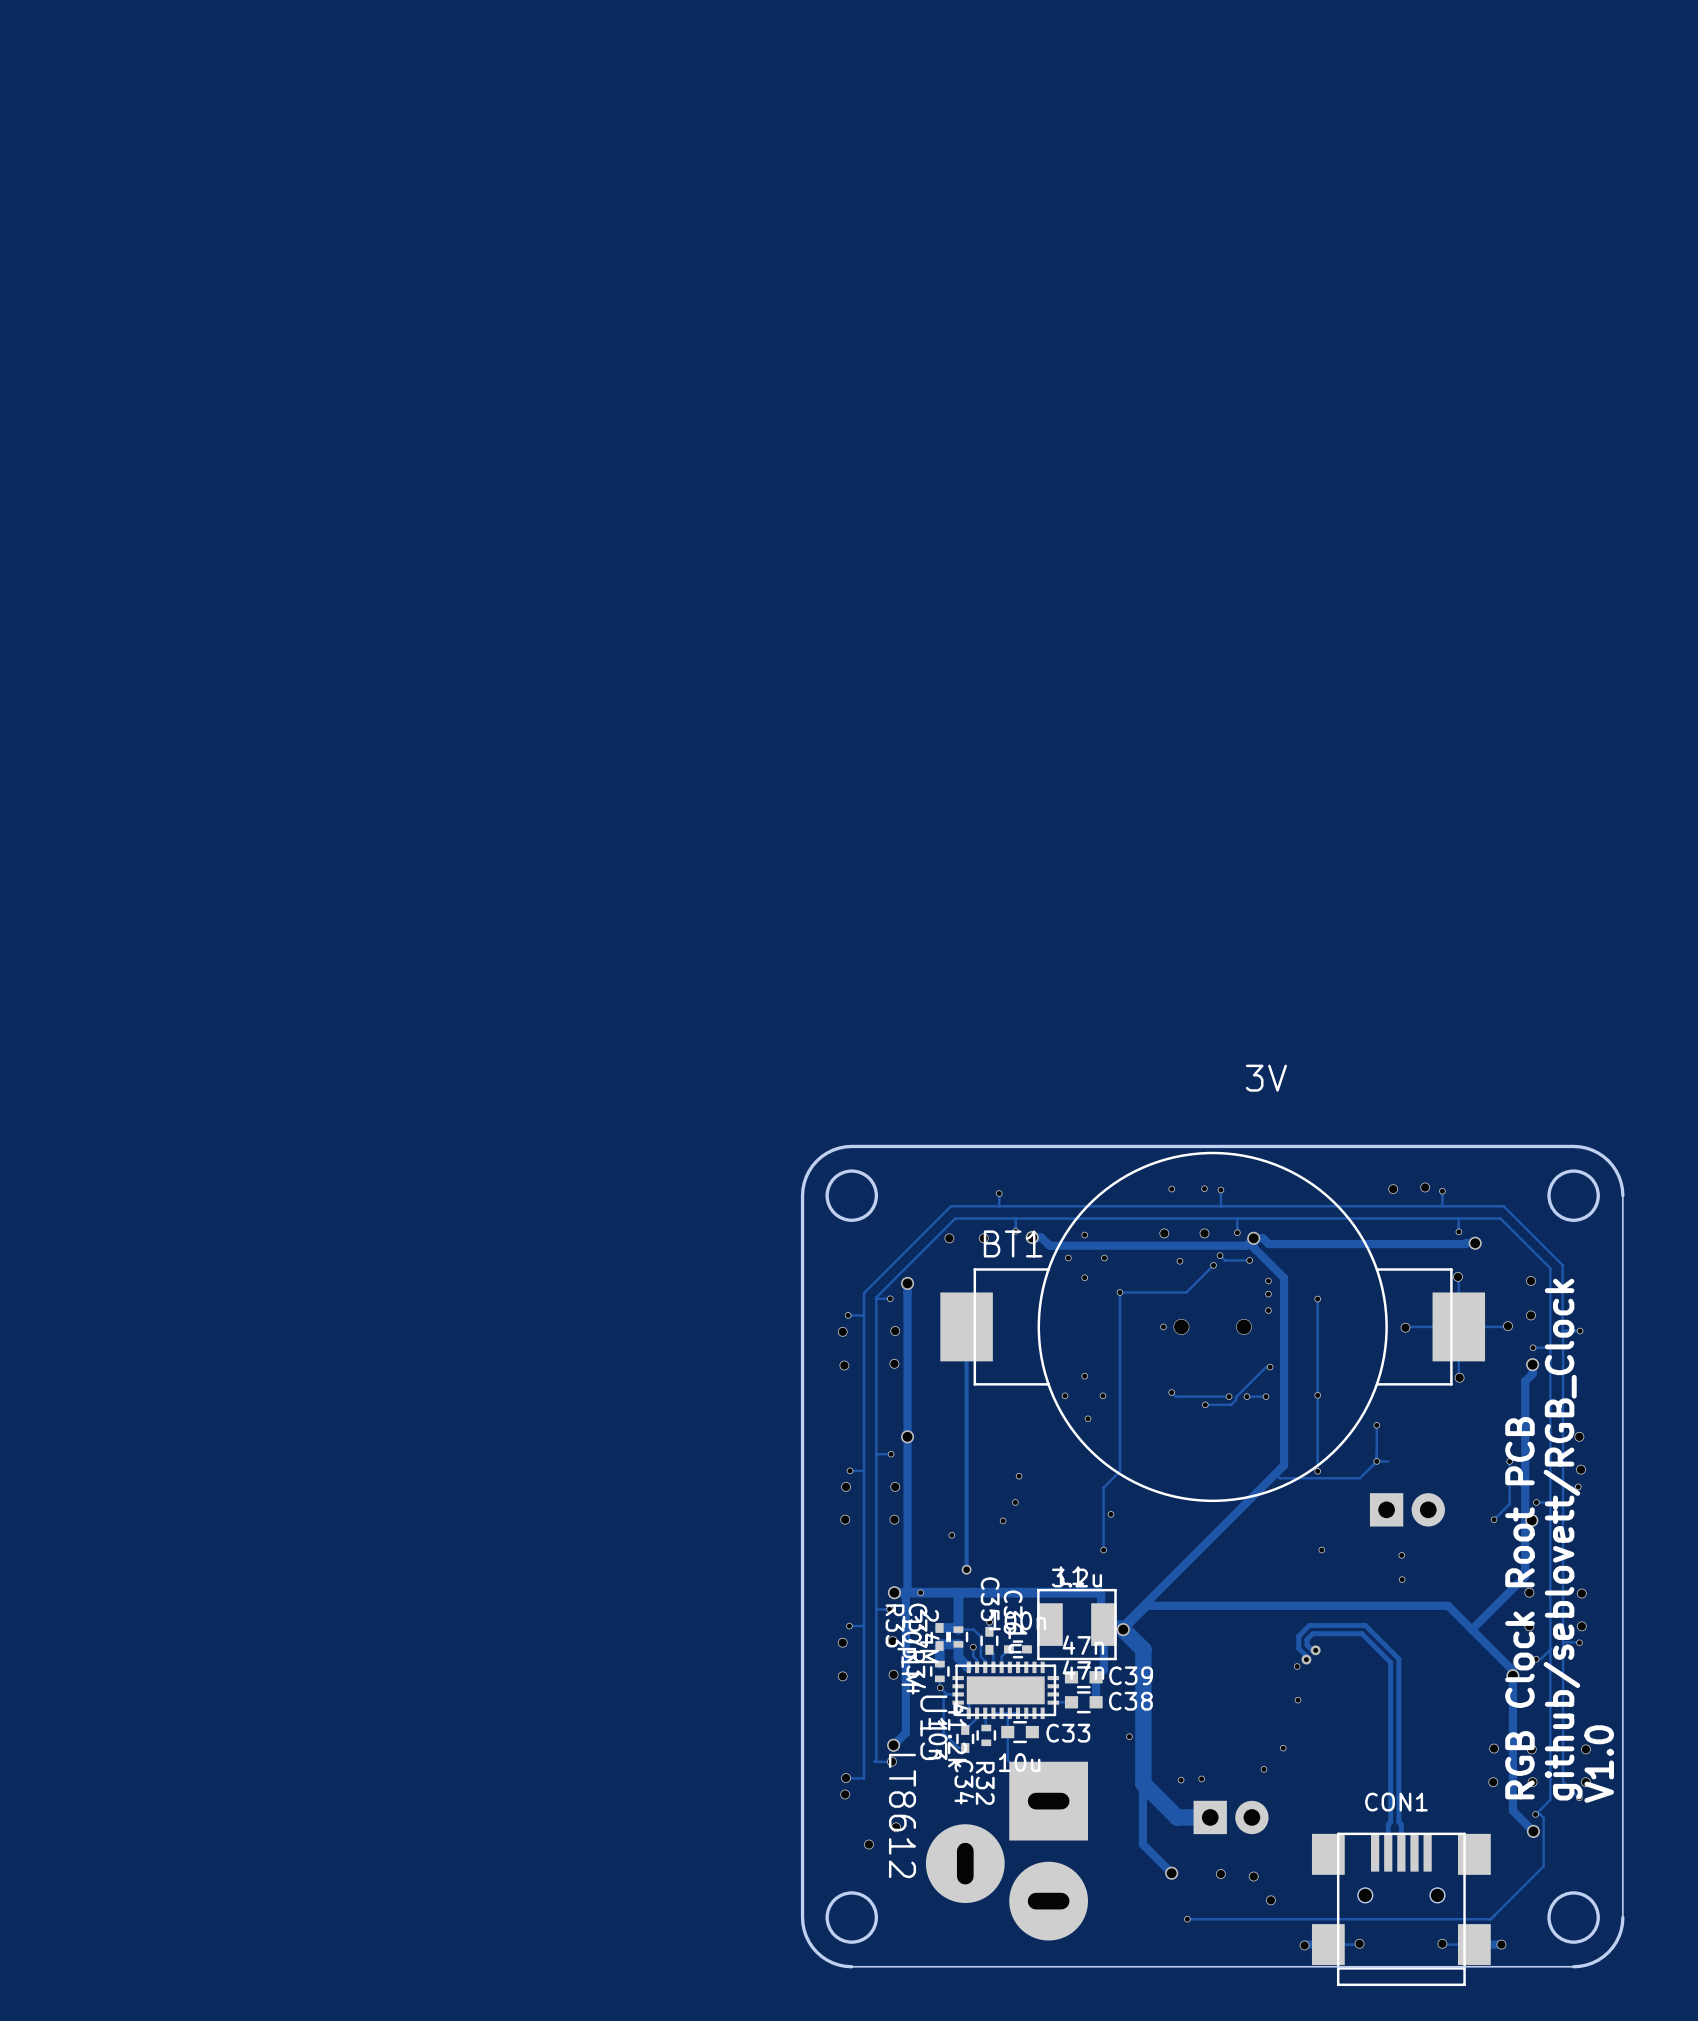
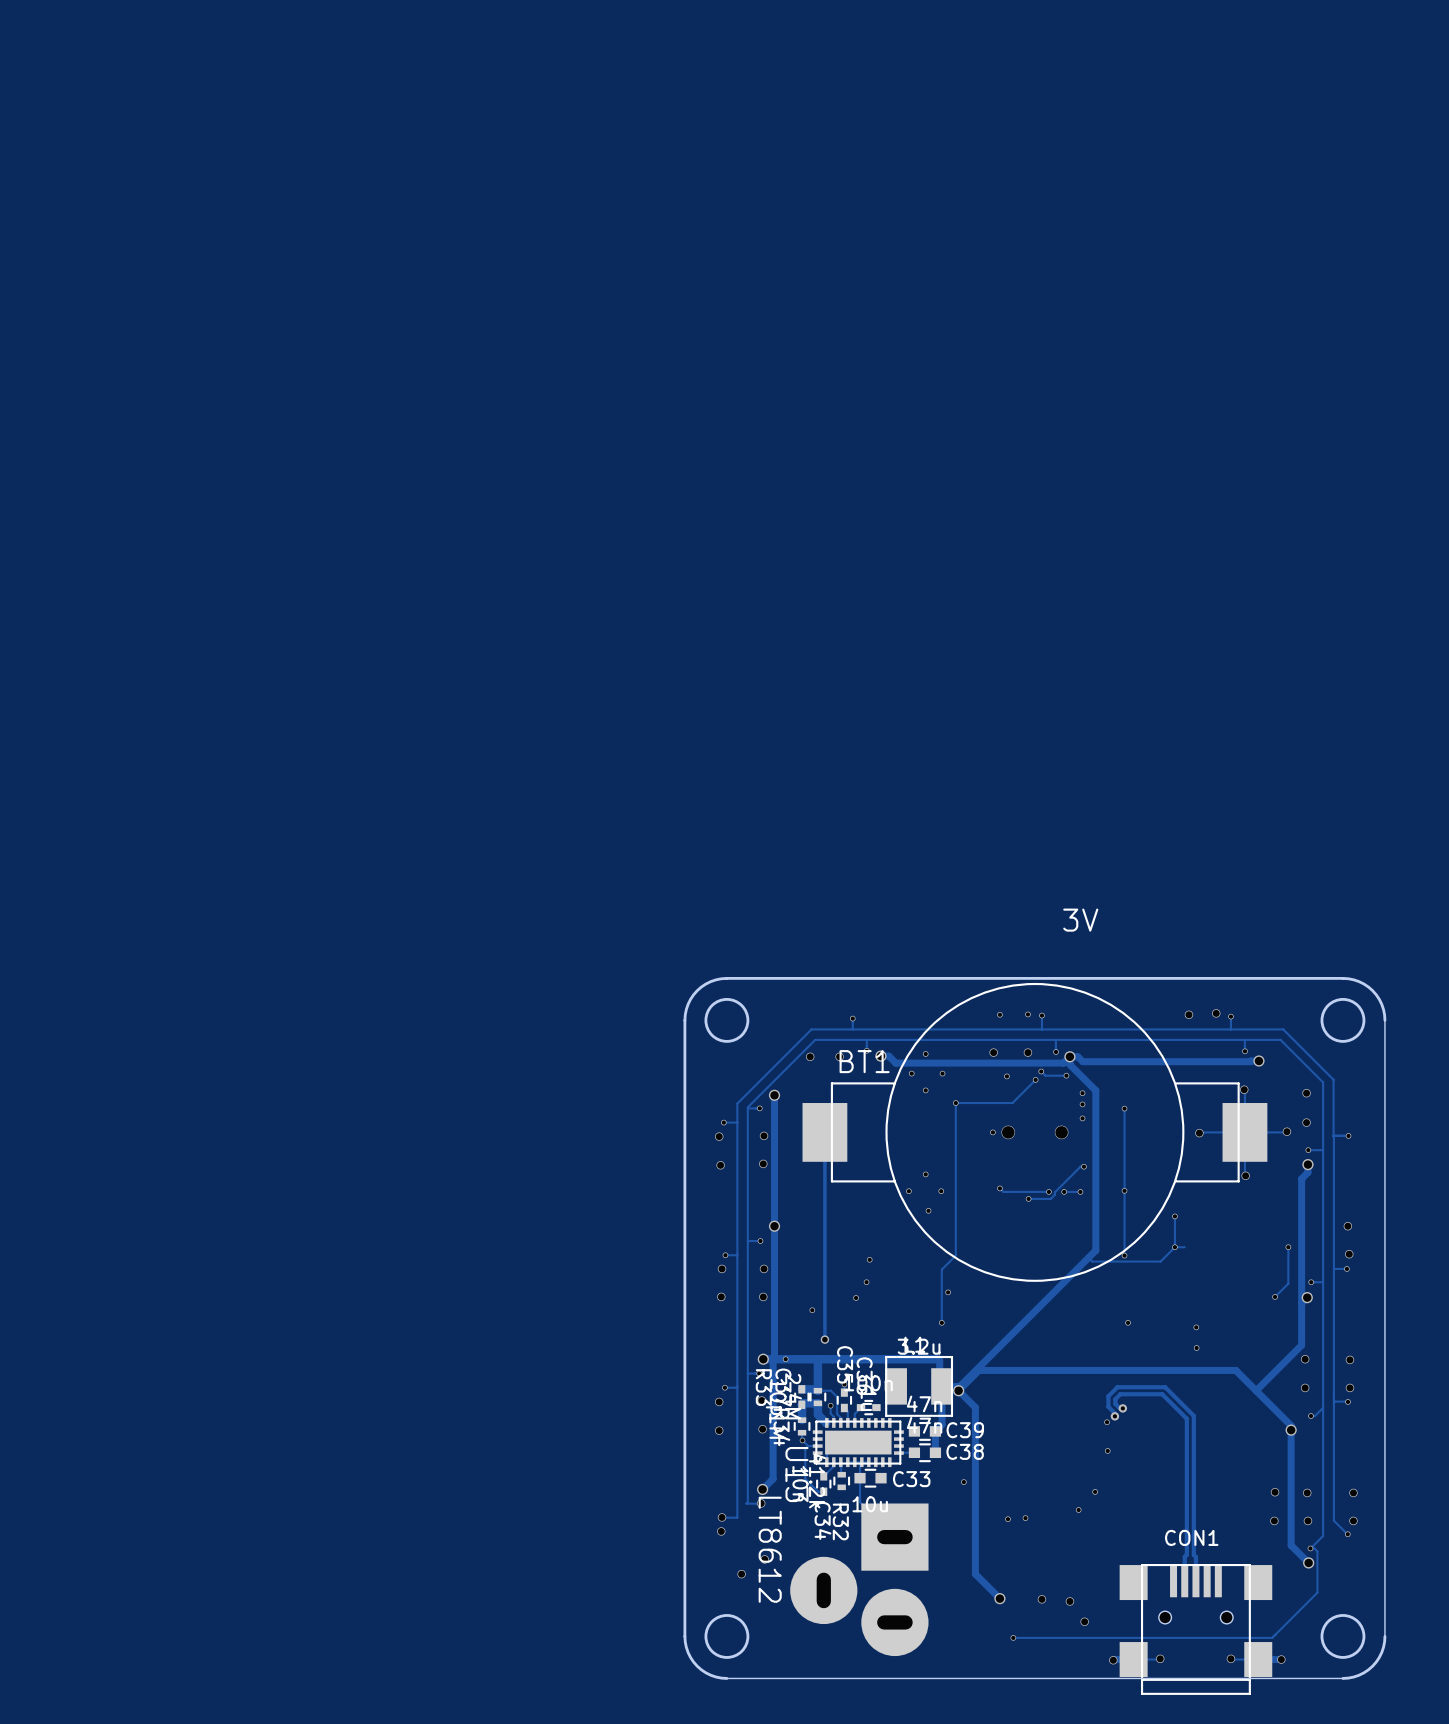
part: (1407, 1509) -> none
text: github/seblovett/RGB_Clock (1563, 1539) -> none
text: RGB Clock Root PCB (1519, 1608) -> none
track: (1123, 1629) (1143, 1649) (1143, 1783) (1177, 1817) (1210, 1817) -> none
text: V1.0 (1599, 1764) -> none
part: (1231, 1817) -> none

